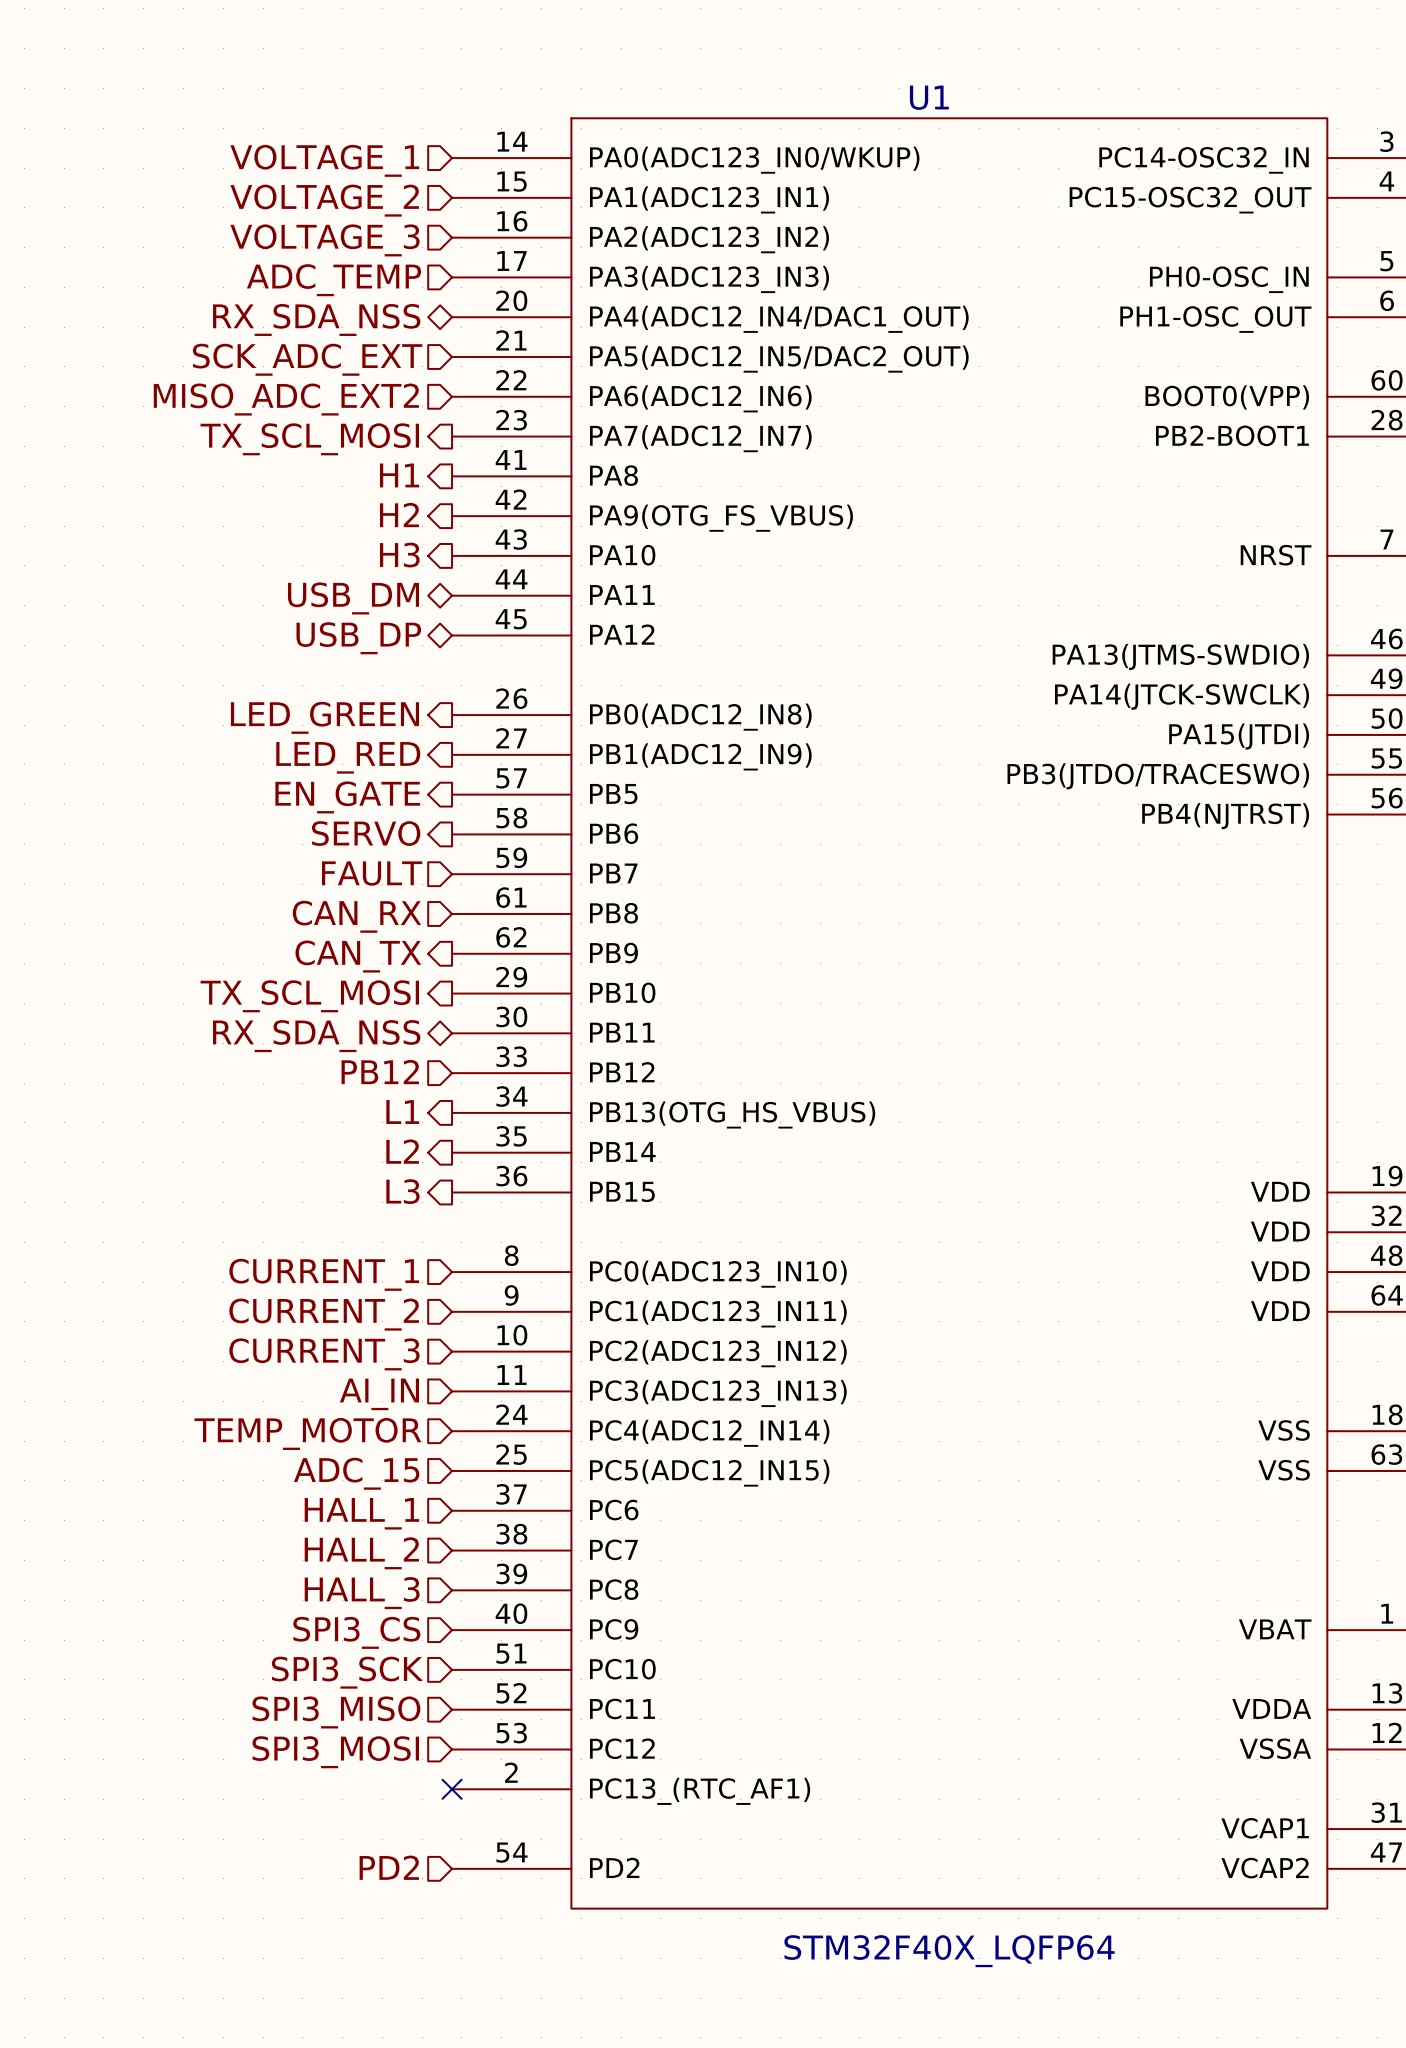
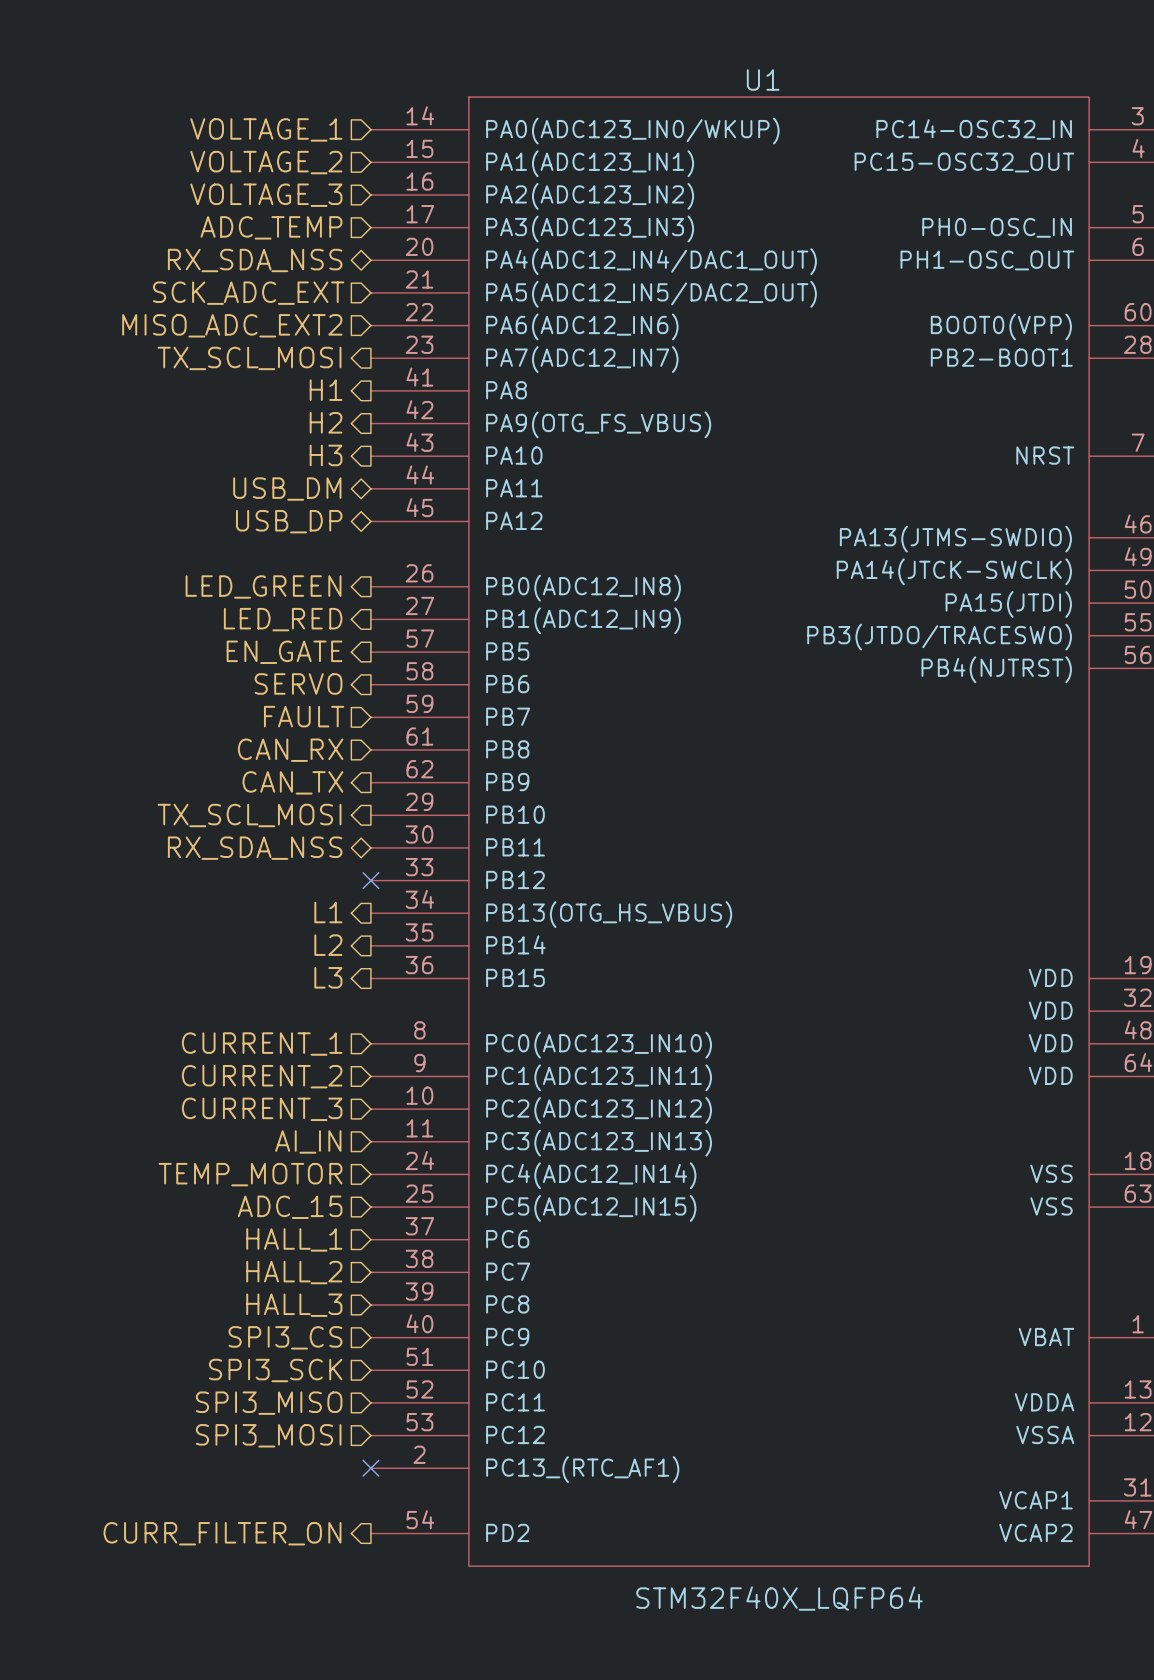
hierarchical label: PB12 (380, 1072) -> none
no-connect mark: none -> (370, 880)
hierarchical label shape: input (389, 1867) -> output (222, 1533)
hierarchical label: PD2 (389, 1867) -> CURR_FILTER_ON (222, 1533)

